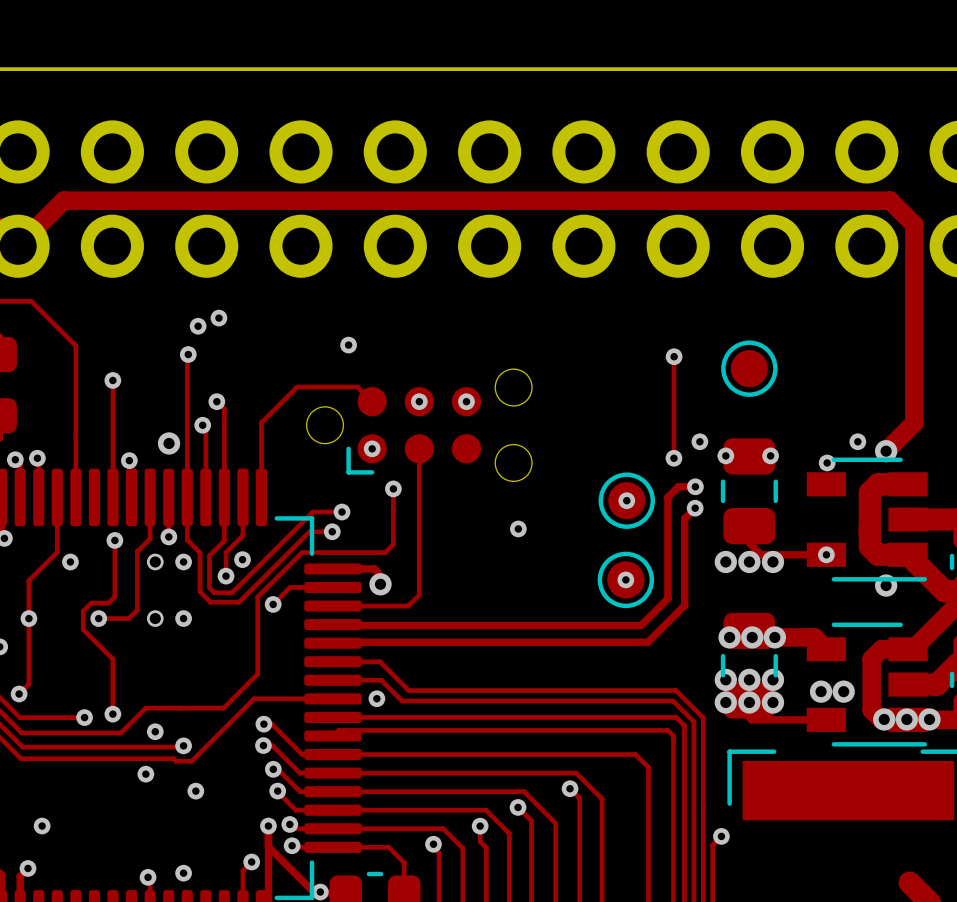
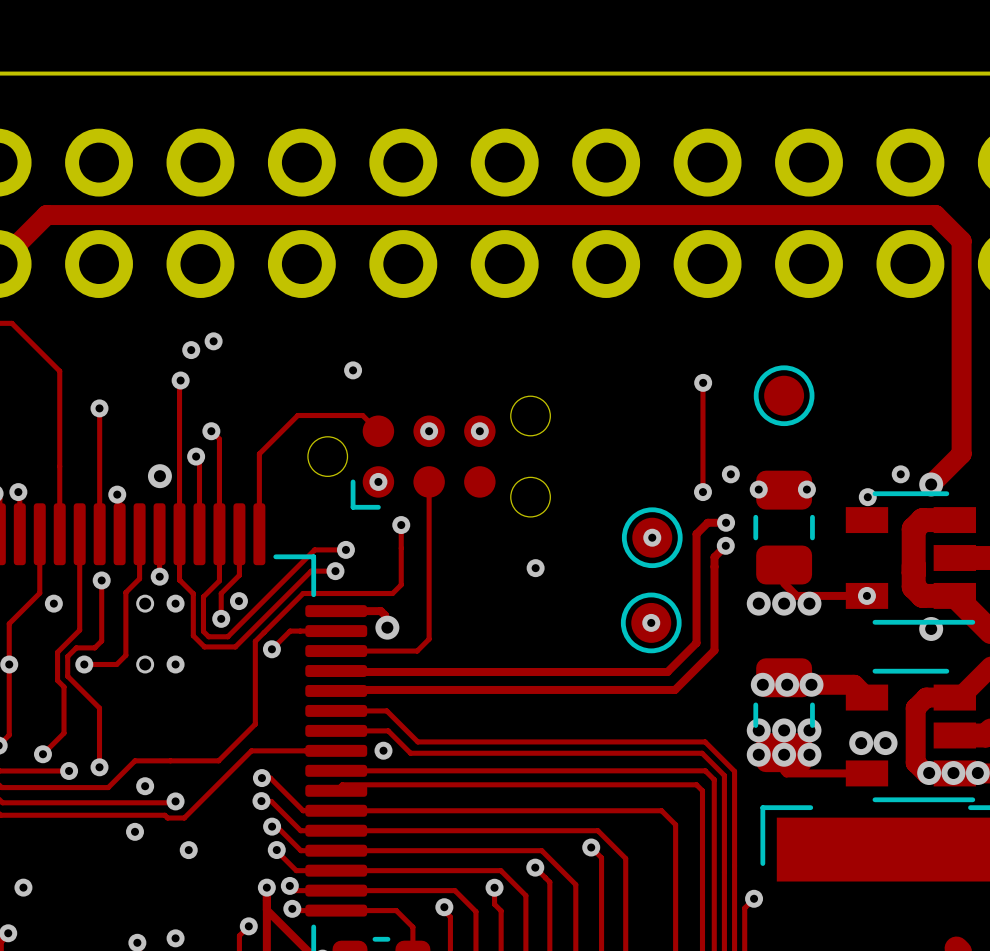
track: none -> (79, 534) (79, 630) (57, 652) (57, 680) (64, 686) (64, 733) (42, 754)
via: none -> (42, 754)

